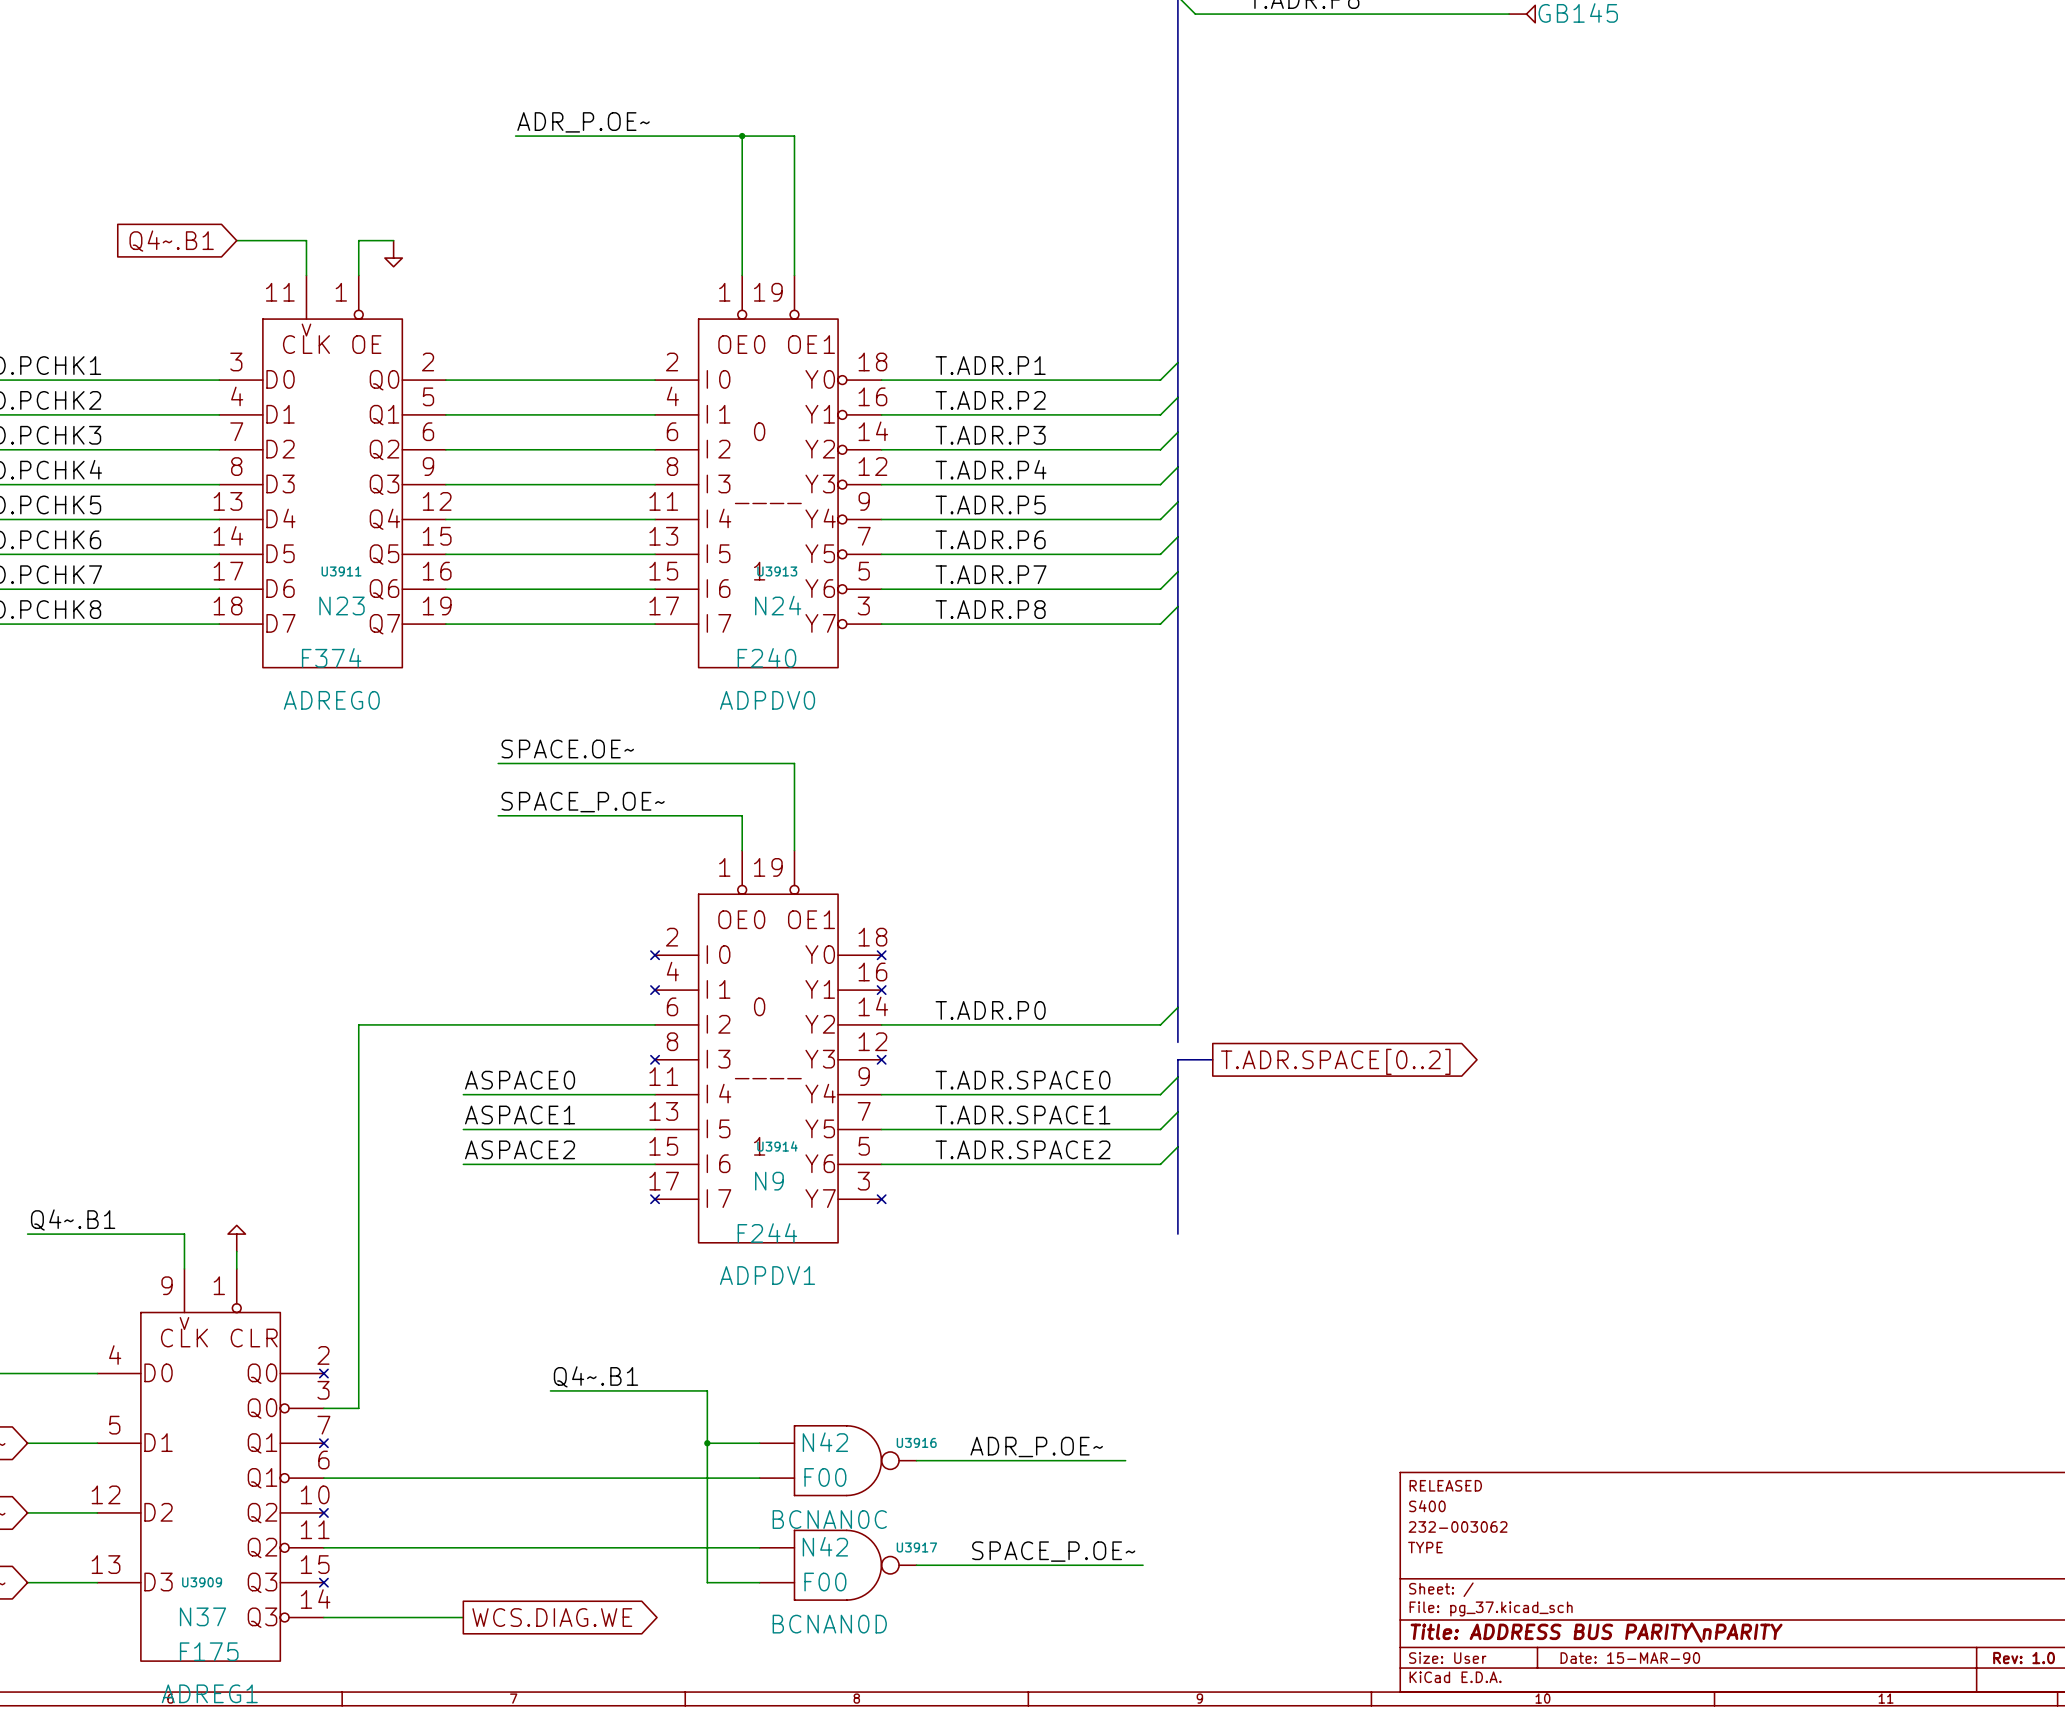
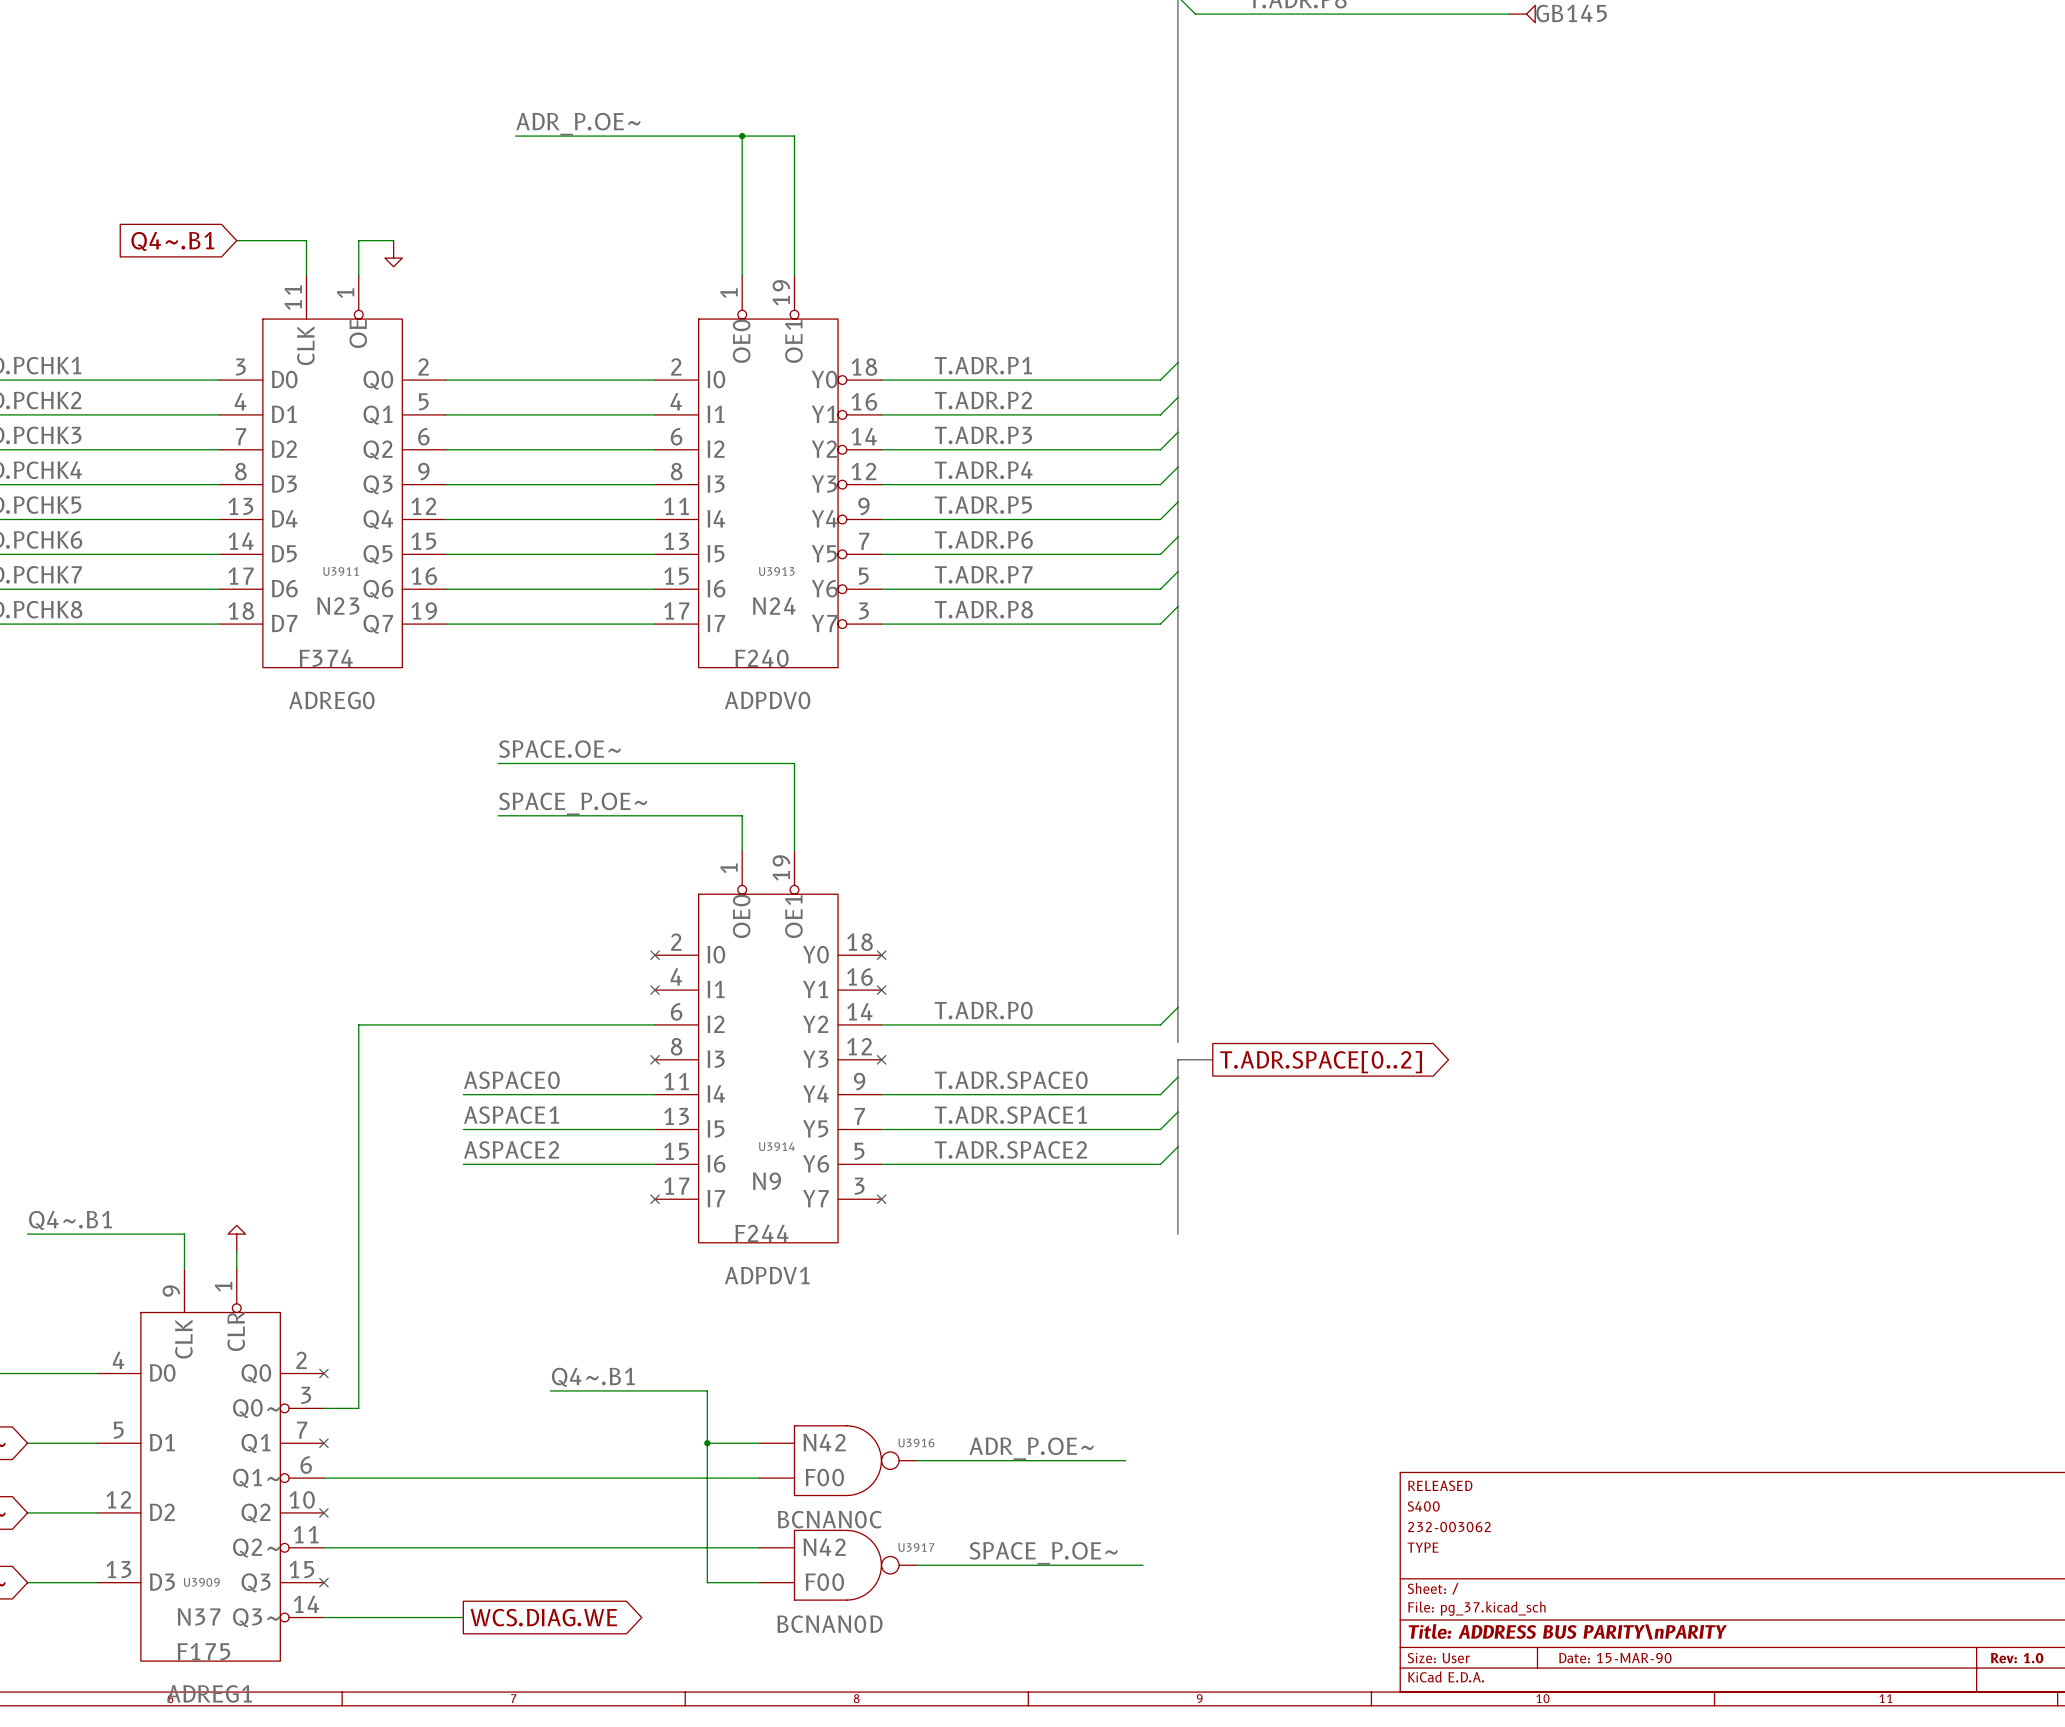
U3911 symbol: [219, 275, 446, 668] -> [219, 275, 446, 668]
U3913 symbol: [655, 275, 882, 668] -> [655, 275, 882, 668]
U3914 symbol: [655, 850, 882, 1243] -> [655, 850, 882, 1243]
U3909 symbol: [97, 1268, 324, 1662] -> [97, 1268, 324, 1662]

